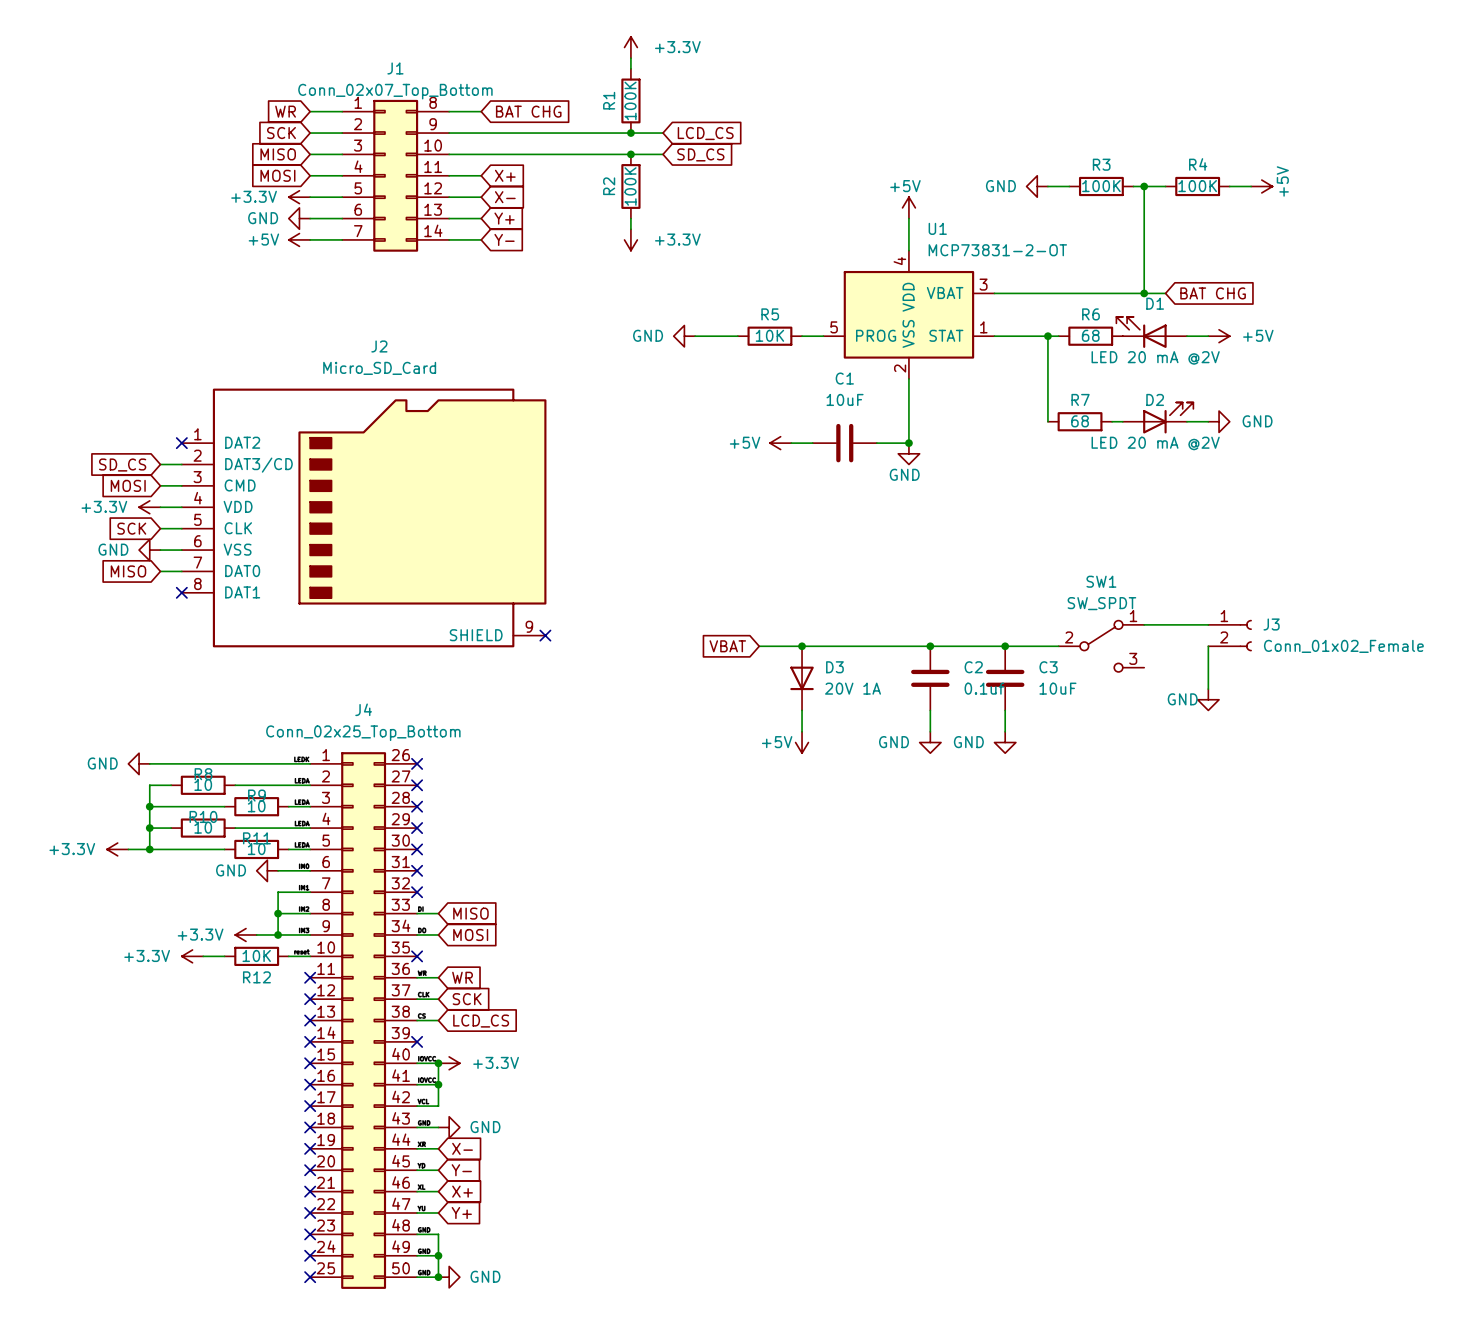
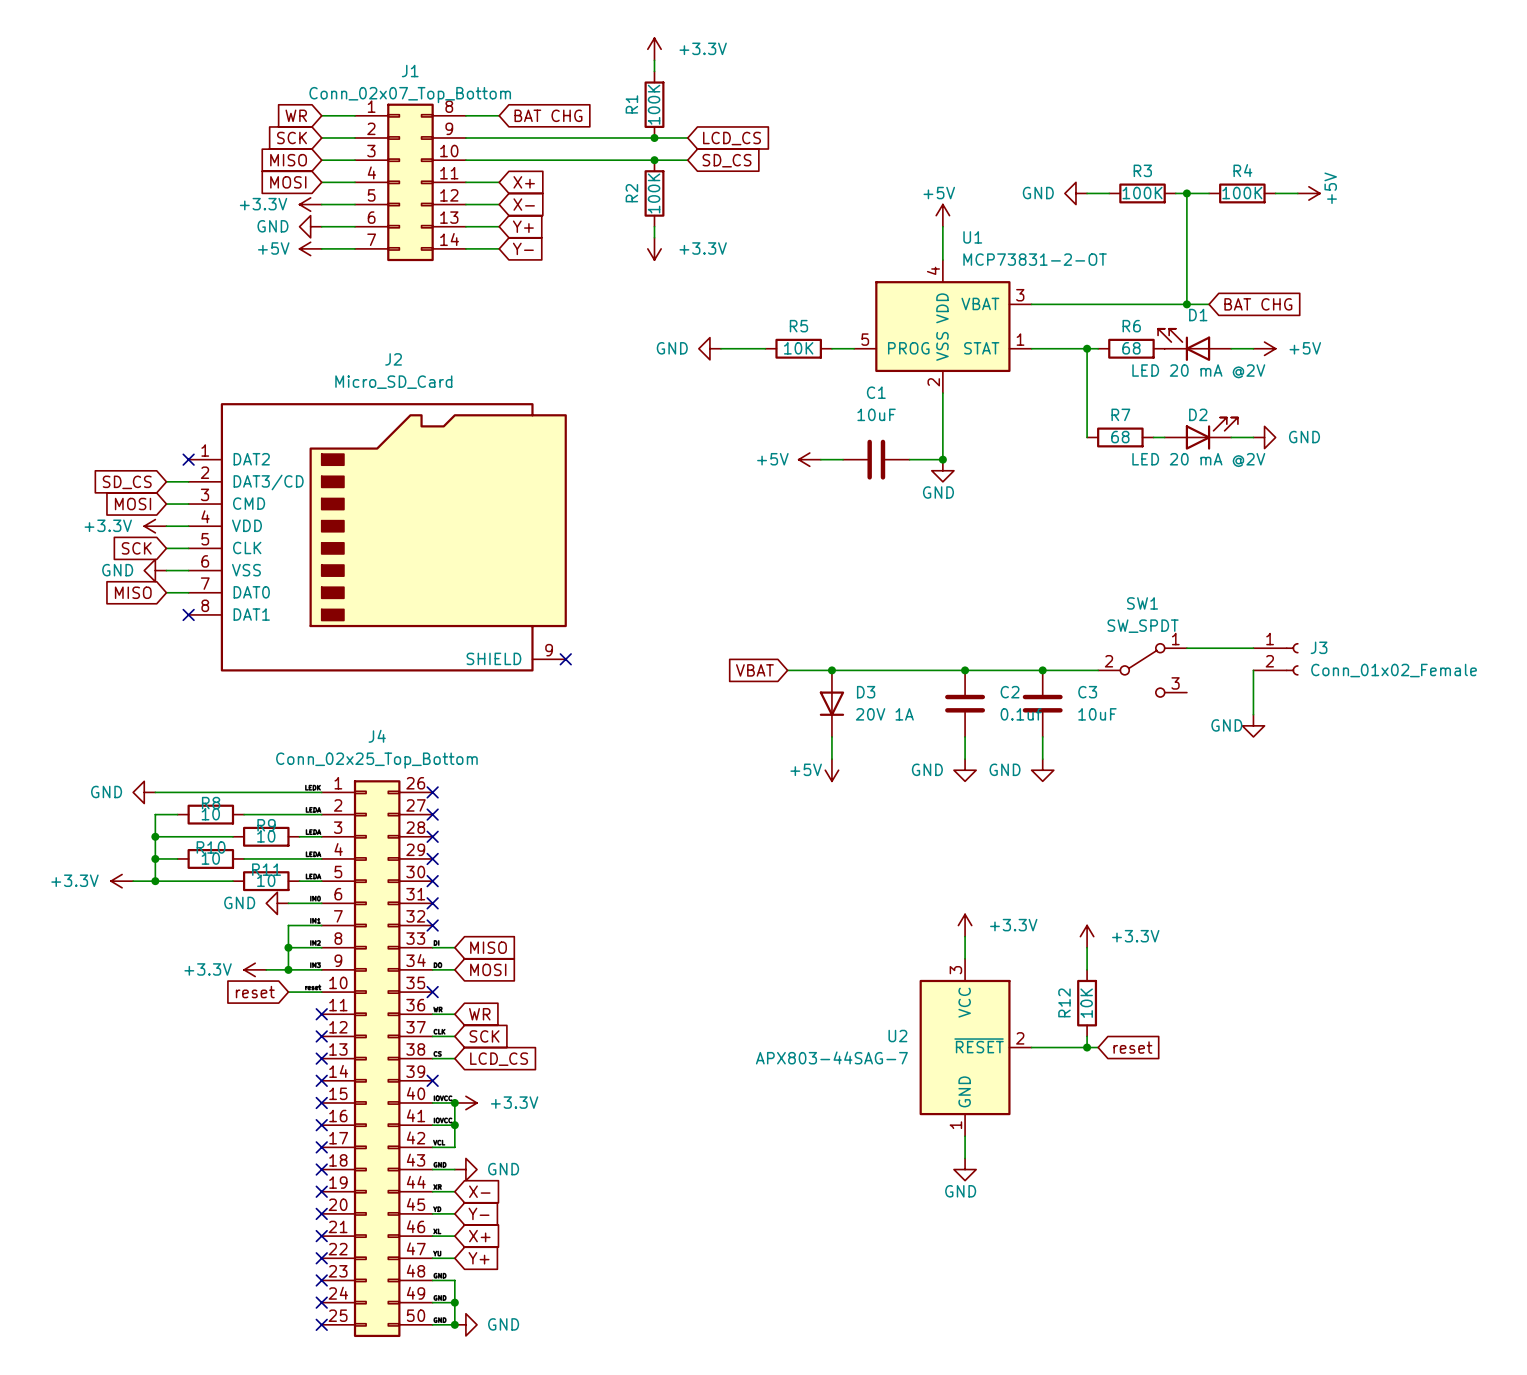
power symbol: none -> +3.3V (965, 925)
wire: none -> (965, 936) (965, 958)
power symbol: none -> +3.3V (1087, 936)
wire: none -> (1087, 947) (1087, 969)
power symbol: +3.3V (192, 956) -> none
wire: (203, 956) (224, 956) -> none
global label: none -> reset (255, 992)
R12 rotation: 0° (256, 956) -> 90° clockwise (1087, 1003)
R12 position: (256, 956) -> (1087, 1003)
wire: none -> (1087, 1036) (1087, 1047)
U2: none -> APX803-44SAG-7 (975, 1047)
wire: none -> (1031, 1047) (1098, 1047)
junction: none -> (1087, 1047)
global label: none -> reset (1132, 1047)
wire: none -> (965, 1136) (965, 1158)
power symbol: none -> GND (965, 1169)

